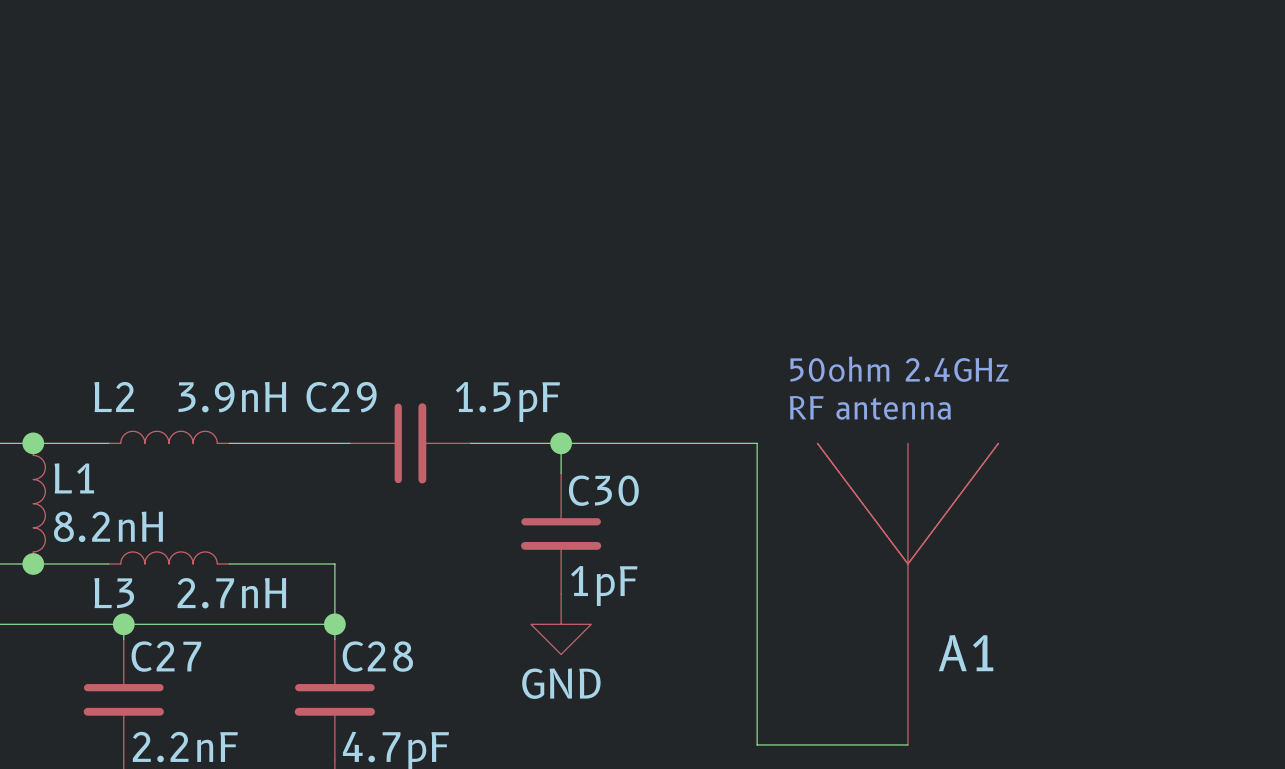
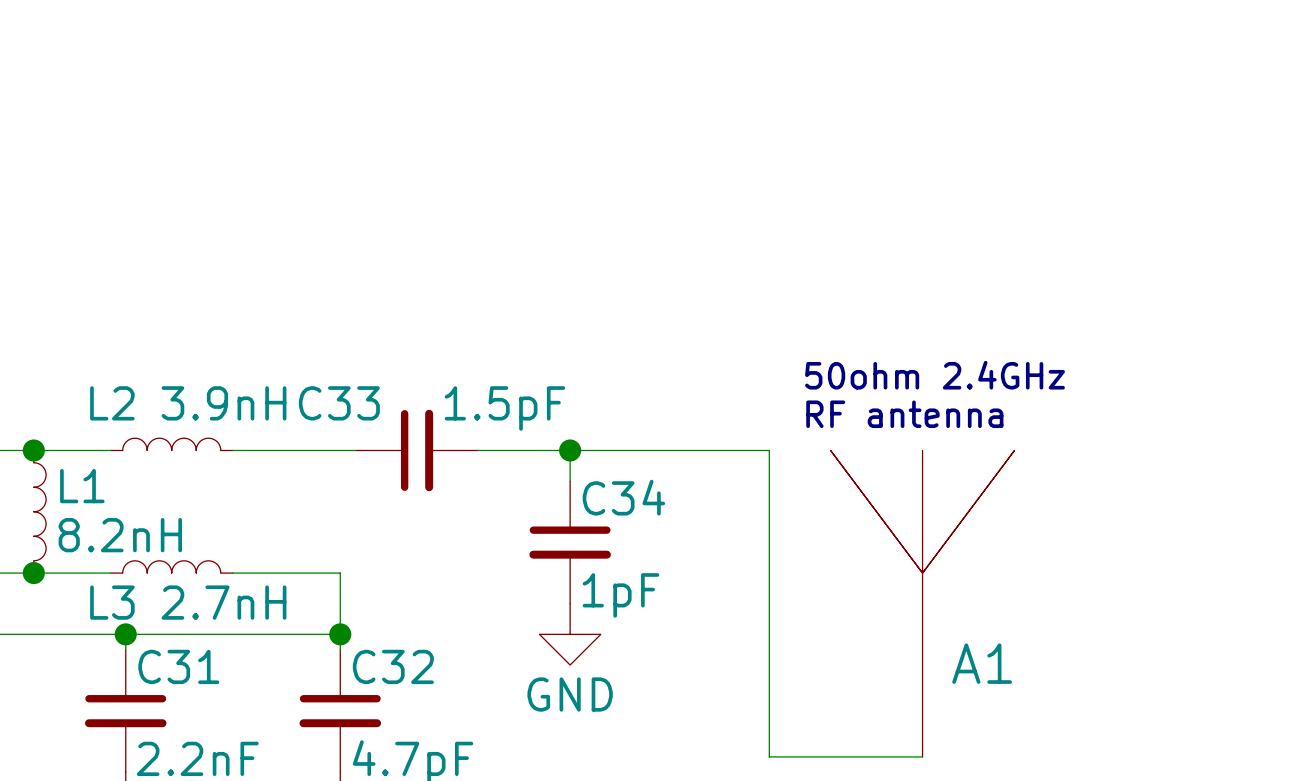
C29 name: C29 (341, 397) -> C33 (339, 403)
C30 name: C30 (603, 490) -> C34 (623, 497)
C27 name: C27 (166, 656) -> C31 (178, 666)
C28 name: C28 (377, 656) -> C32 (393, 666)

